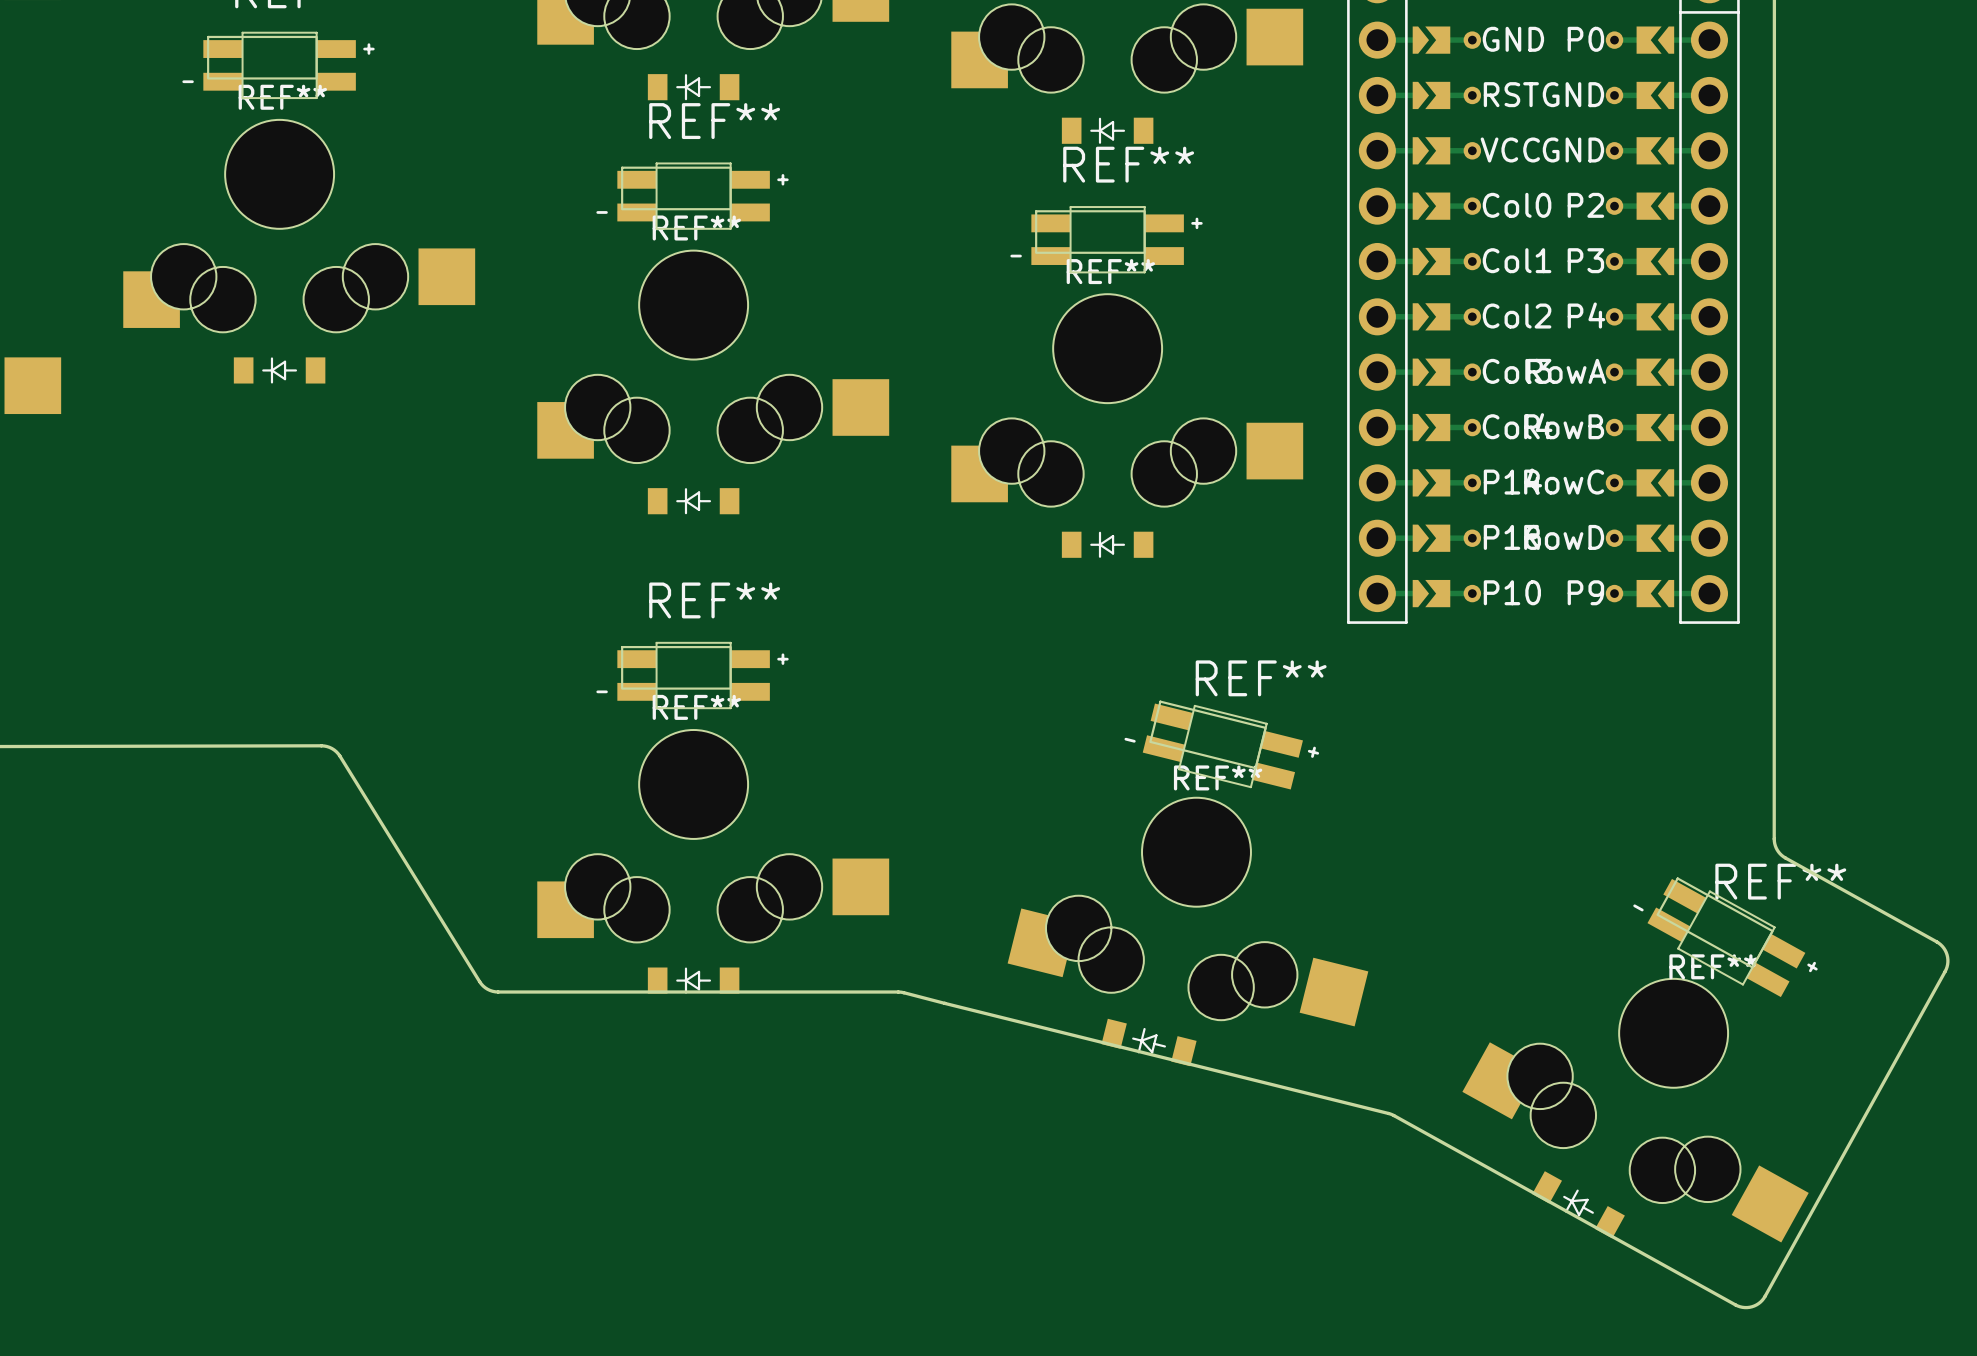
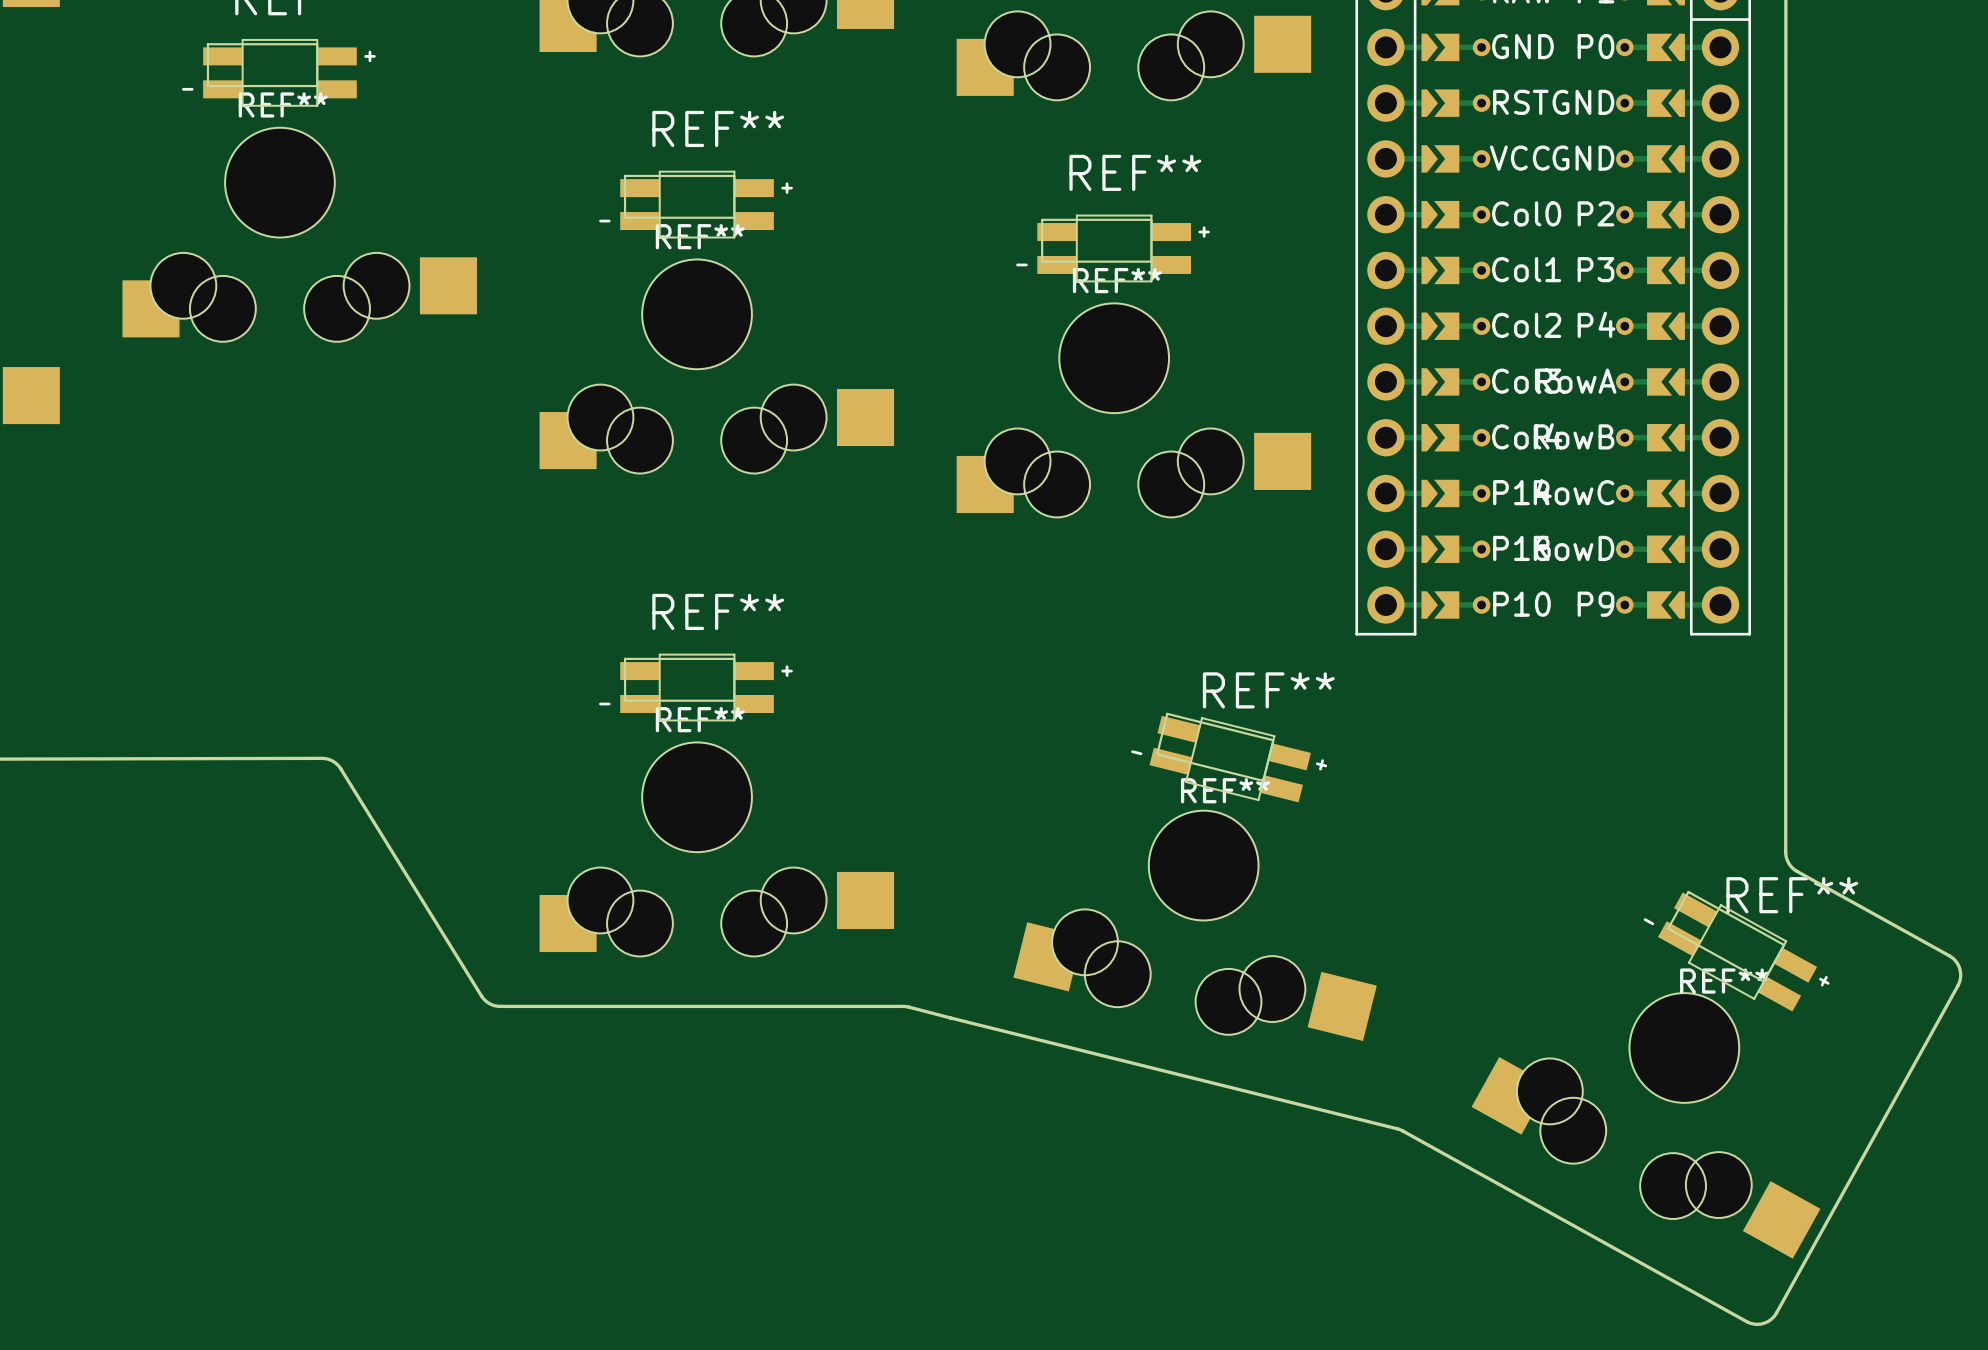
part: (693, 87) -> none
part: (1107, 130) -> none
part: (279, 370) -> none
part: (693, 501) -> none
part: (1107, 544) -> none
part: (693, 980) -> none
part: (1149, 1042) -> none
part: (1578, 1204) -> none

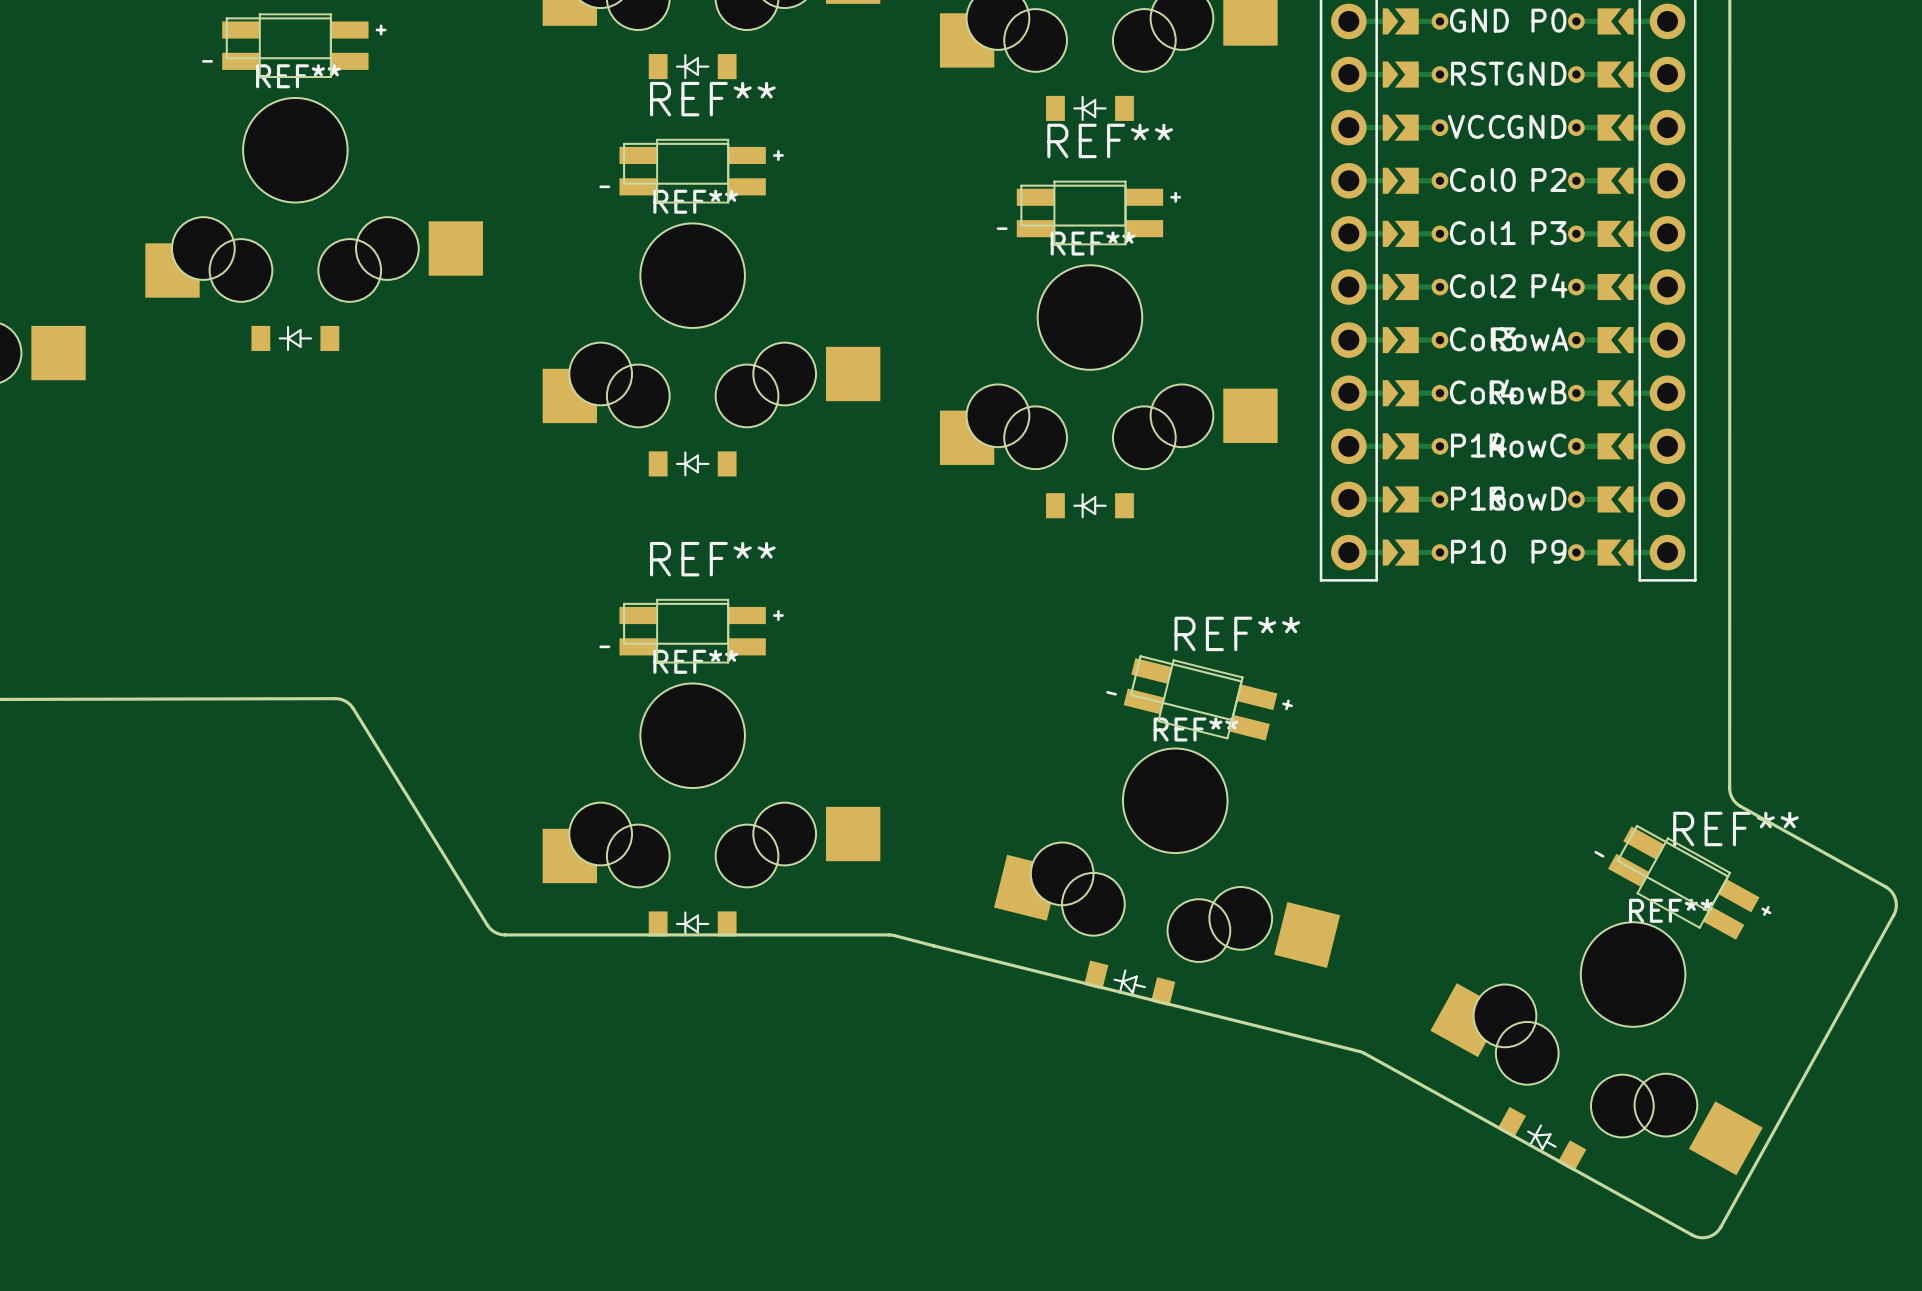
part: none -> (692, 66)
part: none -> (1089, 108)
part: none -> (295, 338)
part: none -> (692, 463)
part: none -> (1089, 505)
part: none -> (692, 923)
part: none -> (1129, 983)
part: none -> (1541, 1139)

